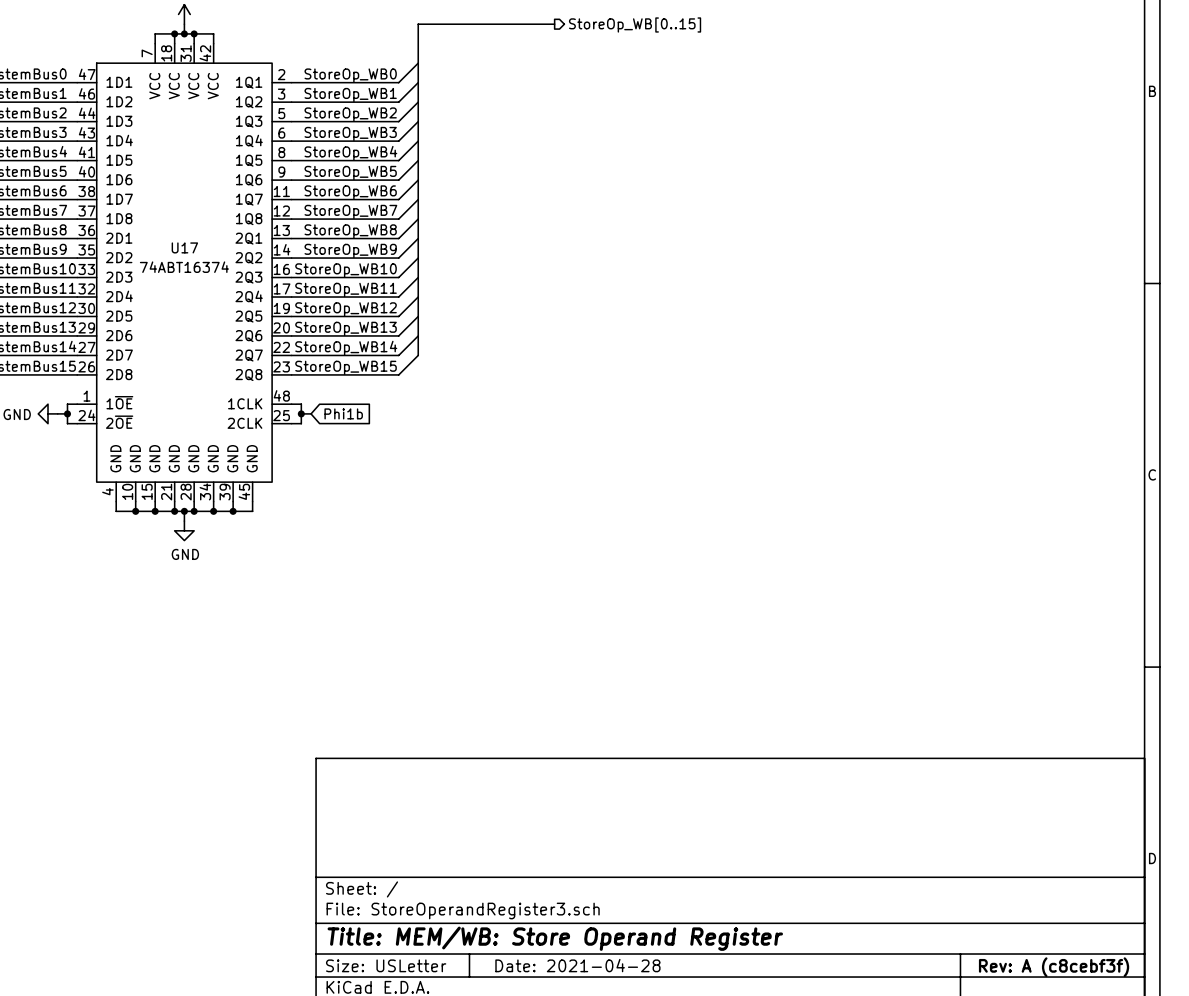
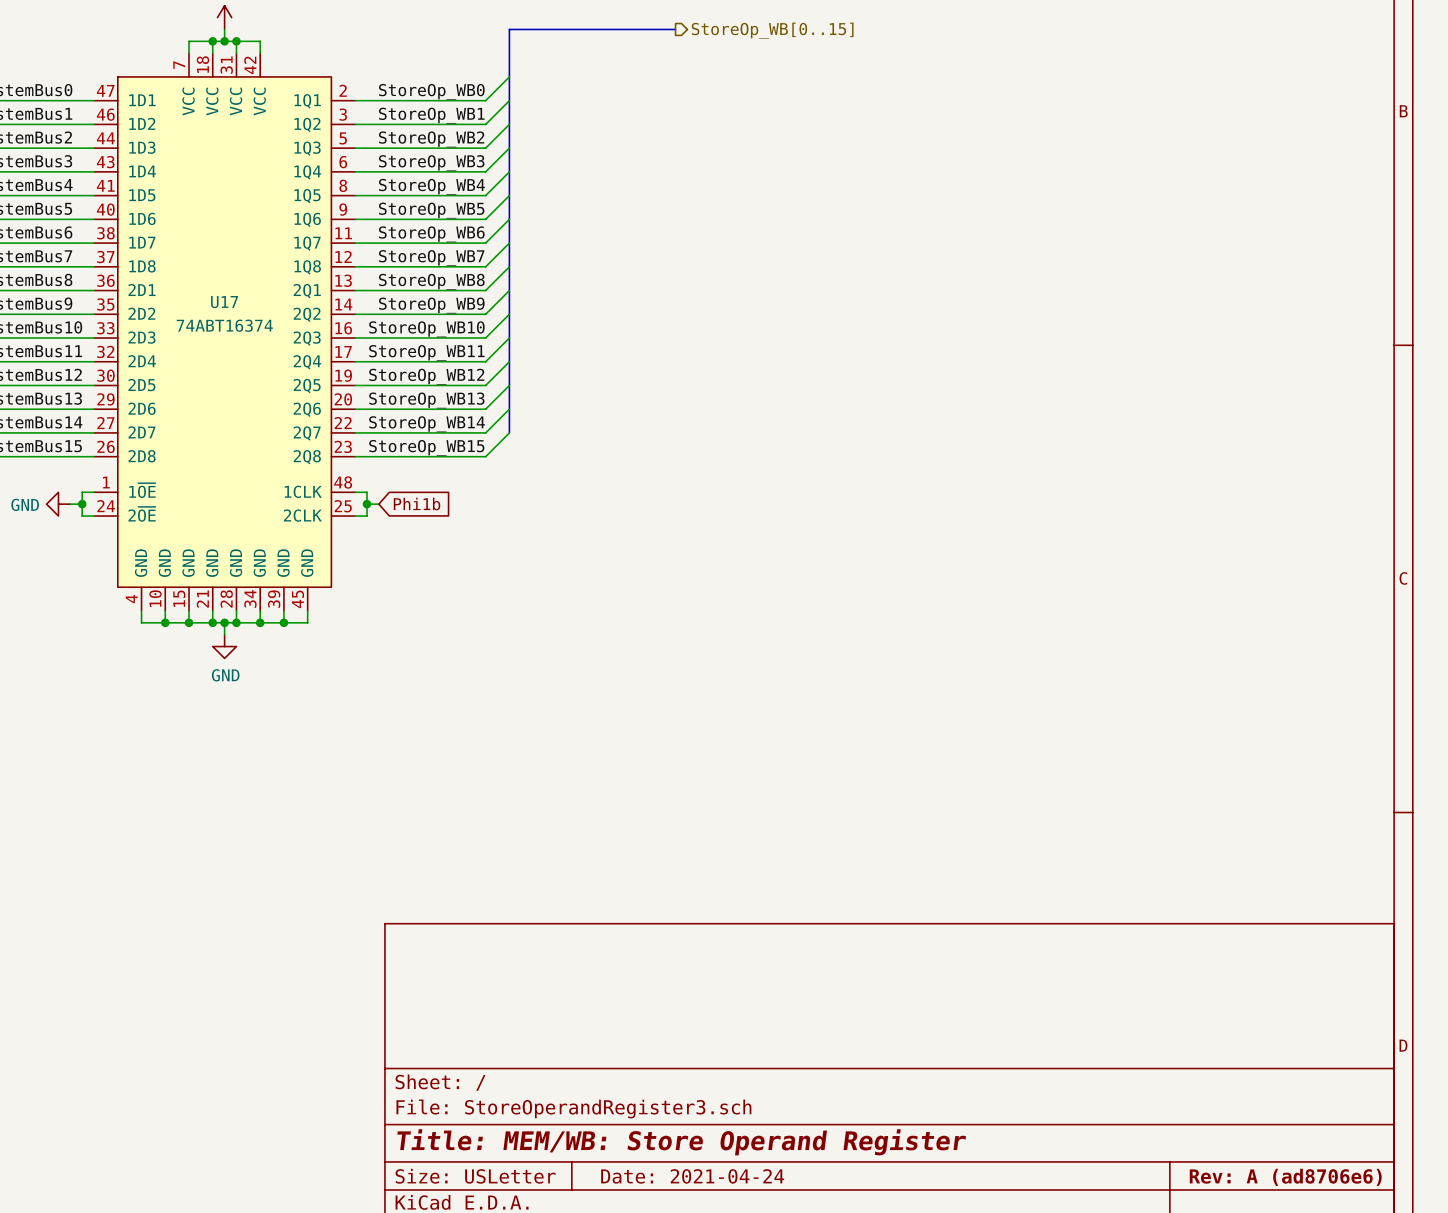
title block: Date: 2021-04-28 (577, 965) -> Date: 2021-04-24 (692, 1176)
title block: Rev: A (c8cebf3f) (1054, 967) -> Rev: A (ad8706e6) (1285, 1177)

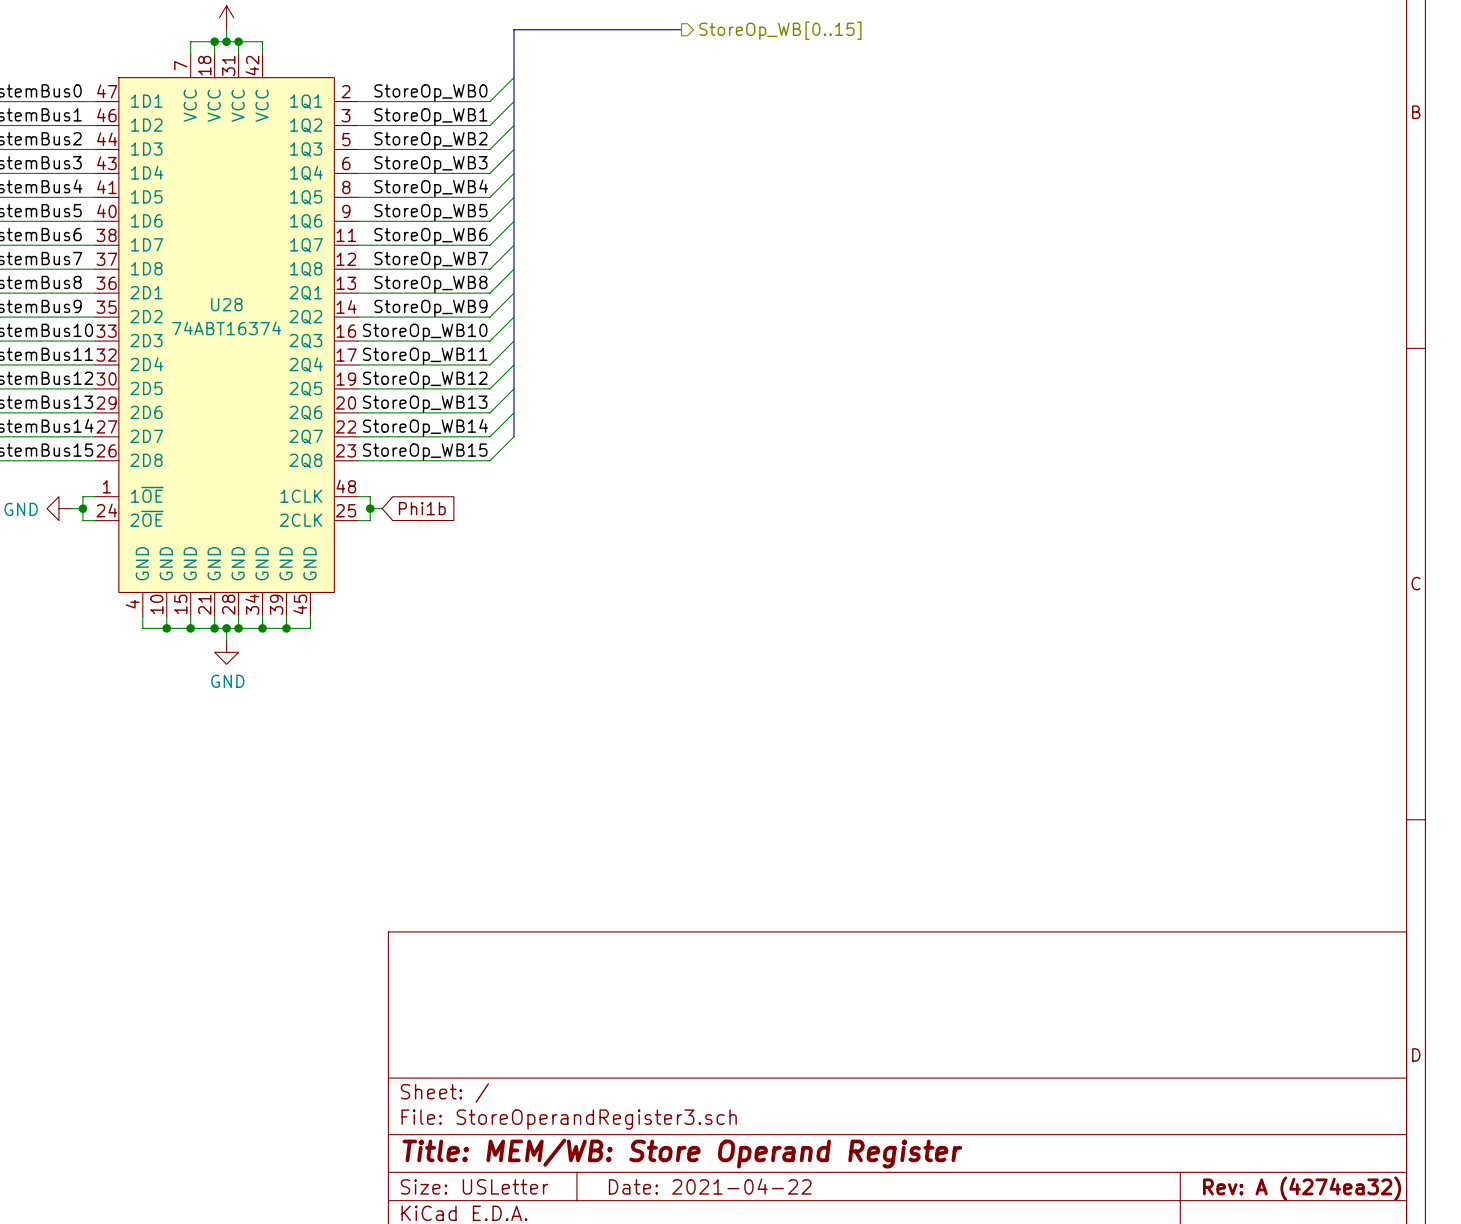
U17 name: U17 (224, 302) -> U28 (226, 304)
title block: Date: 2021-04-24 (692, 1176) -> Date: 2021-04-22 (710, 1186)
title block: Rev: A (ad8706e6) (1285, 1177) -> Rev: A (4274ea32) (1302, 1188)

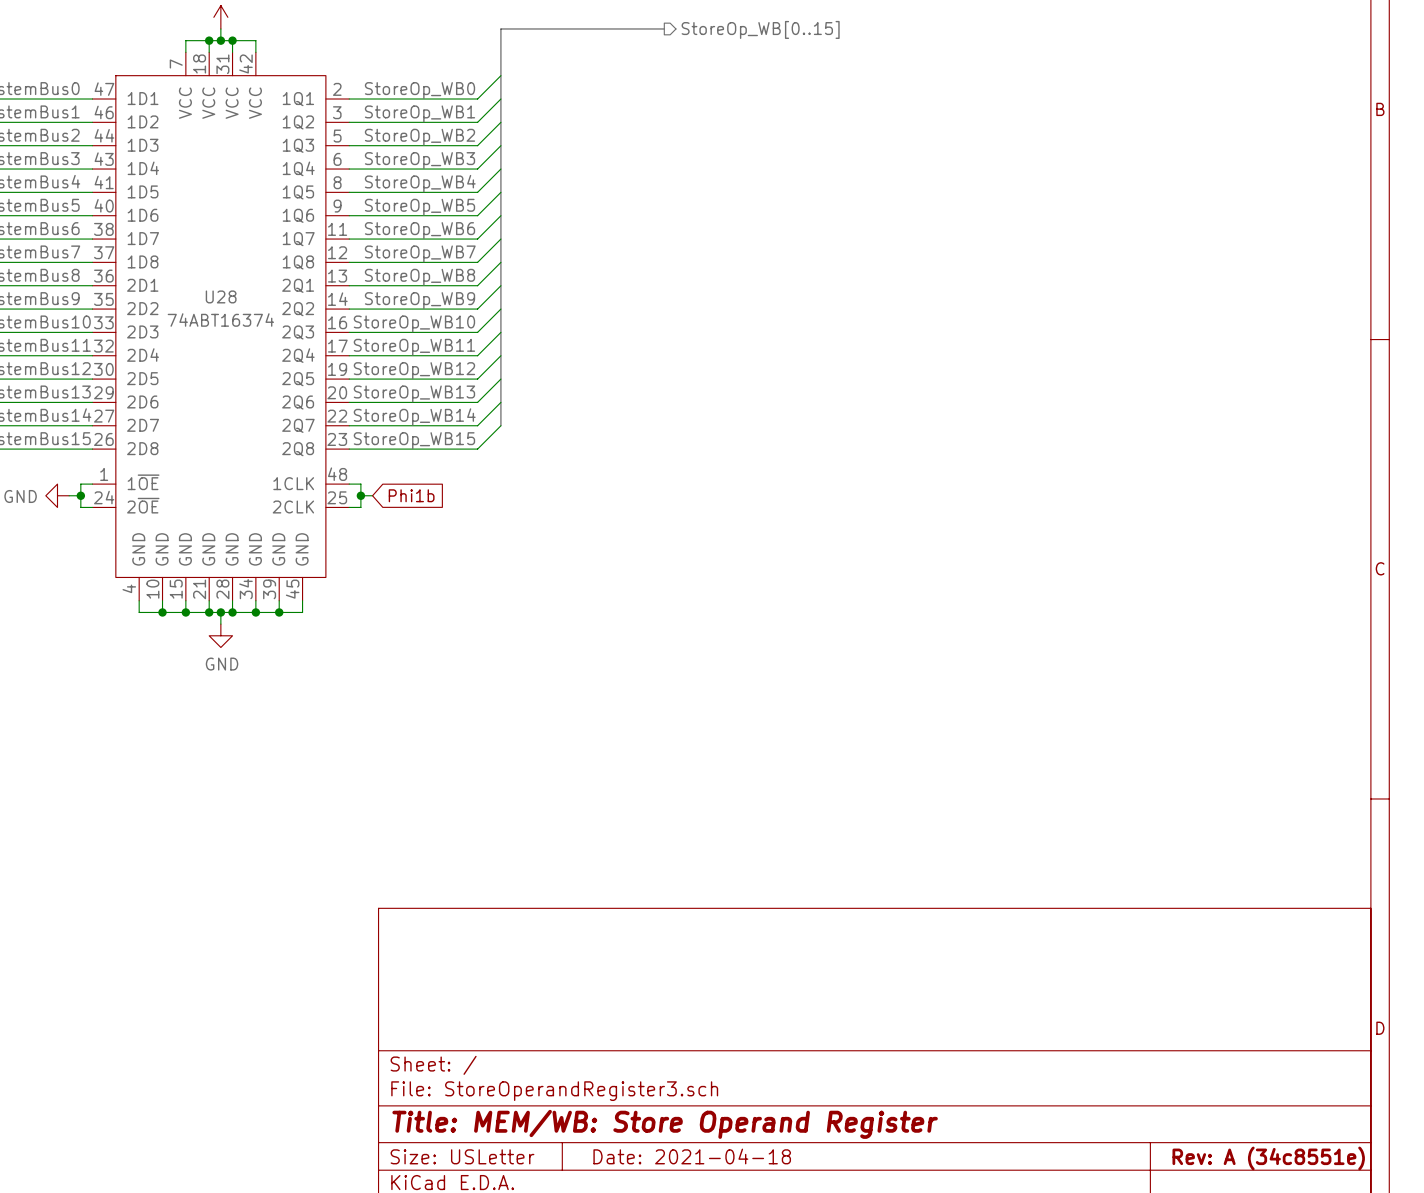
title block: Date: 2021-04-22 (710, 1186) -> Date: 2021-04-18 (692, 1156)
title block: Rev: A (4274ea32) (1302, 1188) -> Rev: A (34c8551e) (1268, 1158)

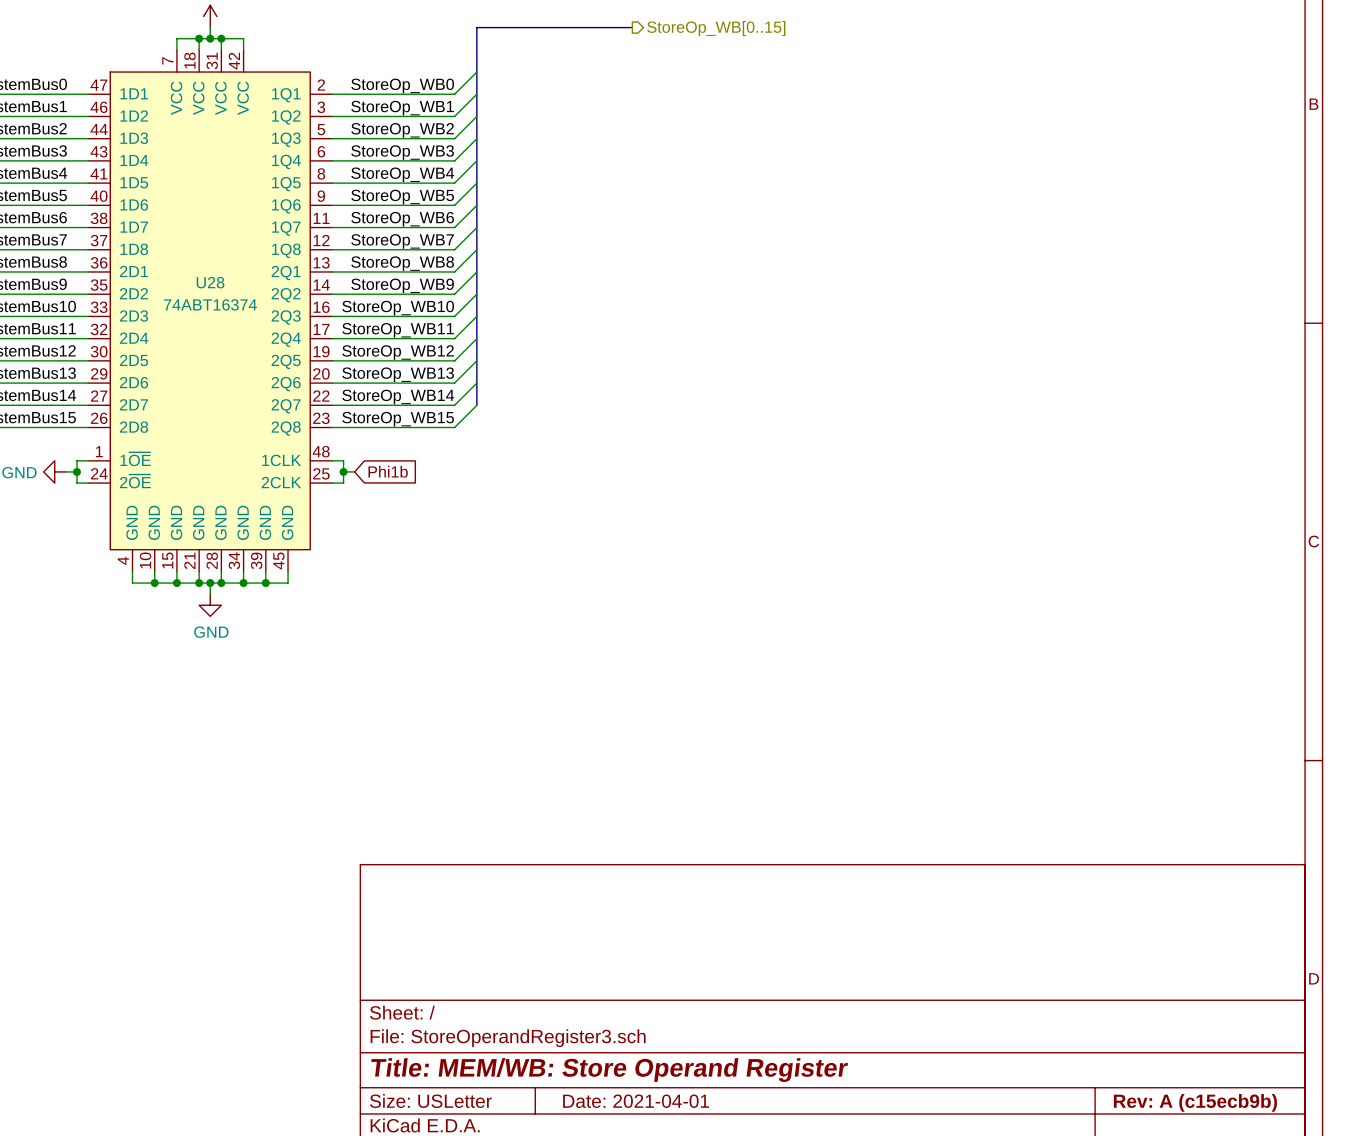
title block: Date: 2021-04-18 (692, 1156) -> Date: 2021-04-01 (636, 1101)
title block: Rev: A (34c8551e) (1268, 1158) -> Rev: A (c15ecb9b) (1195, 1102)

